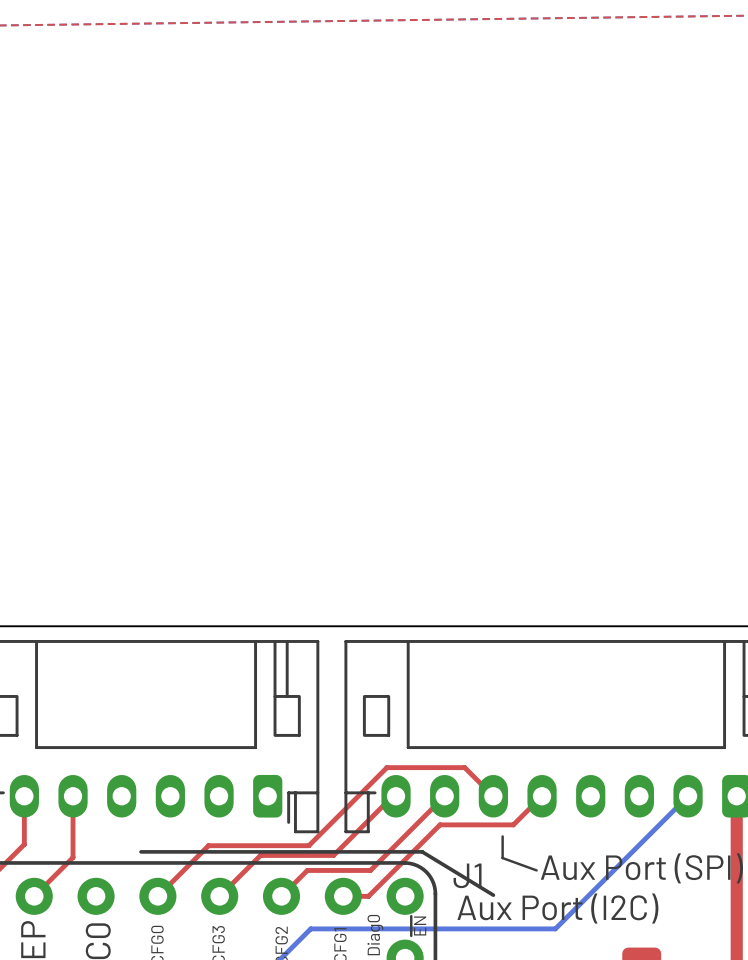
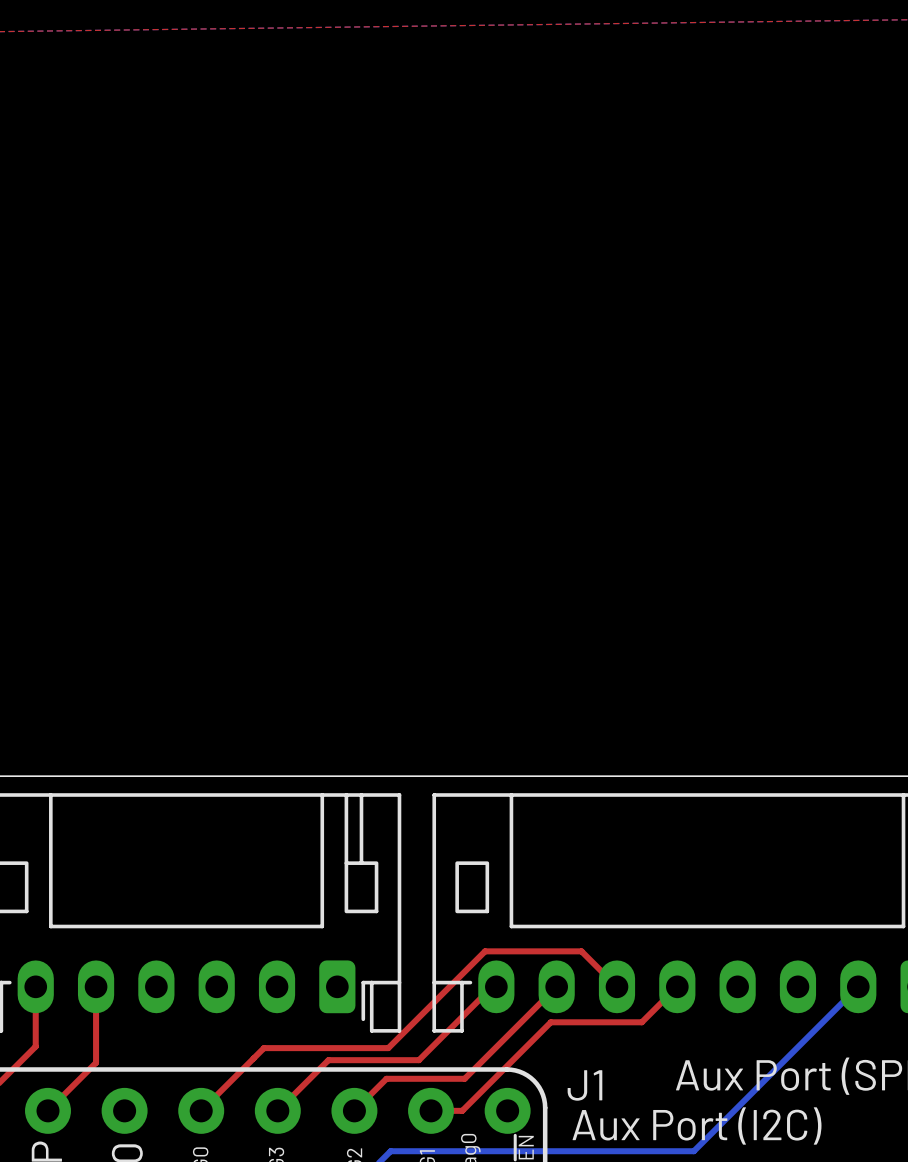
line: (502, 836) (502, 858) (536, 870) -> none
line: (141, 851) (422, 851) (493, 895) -> none

